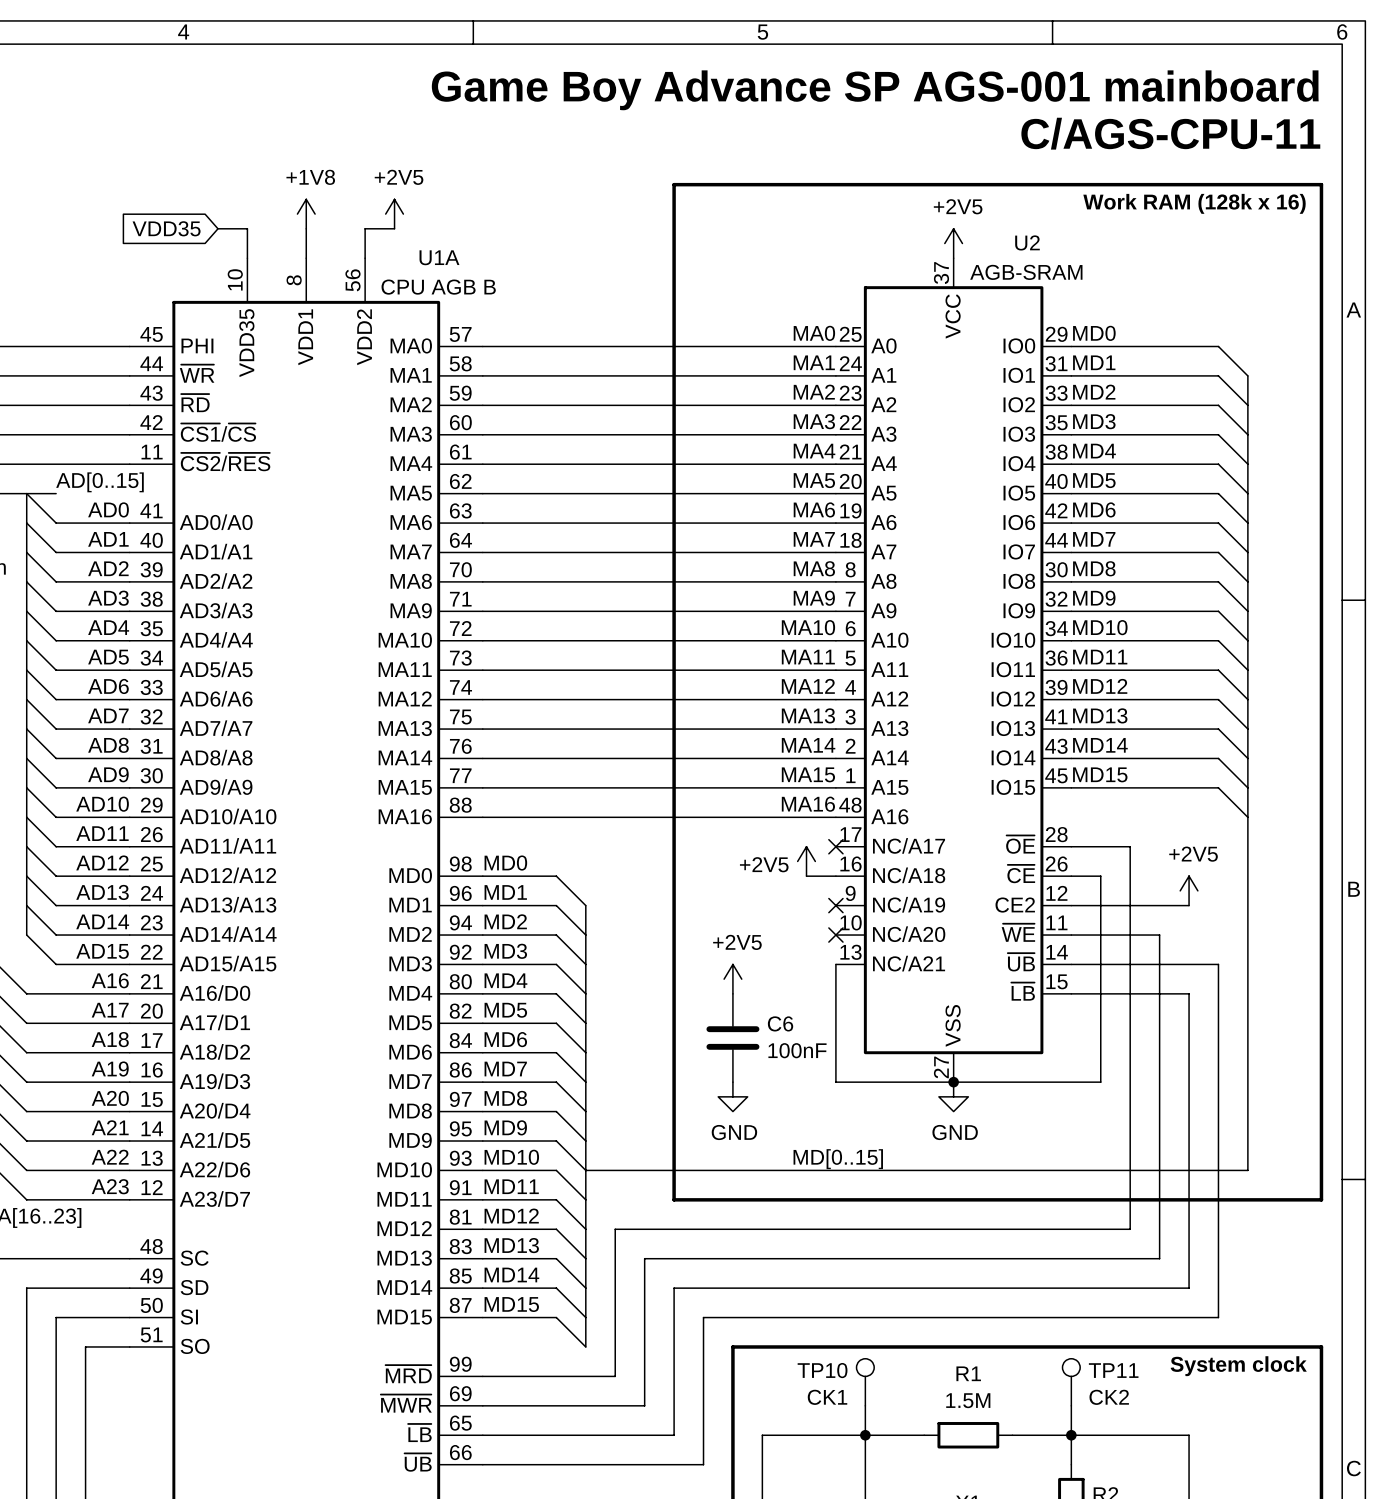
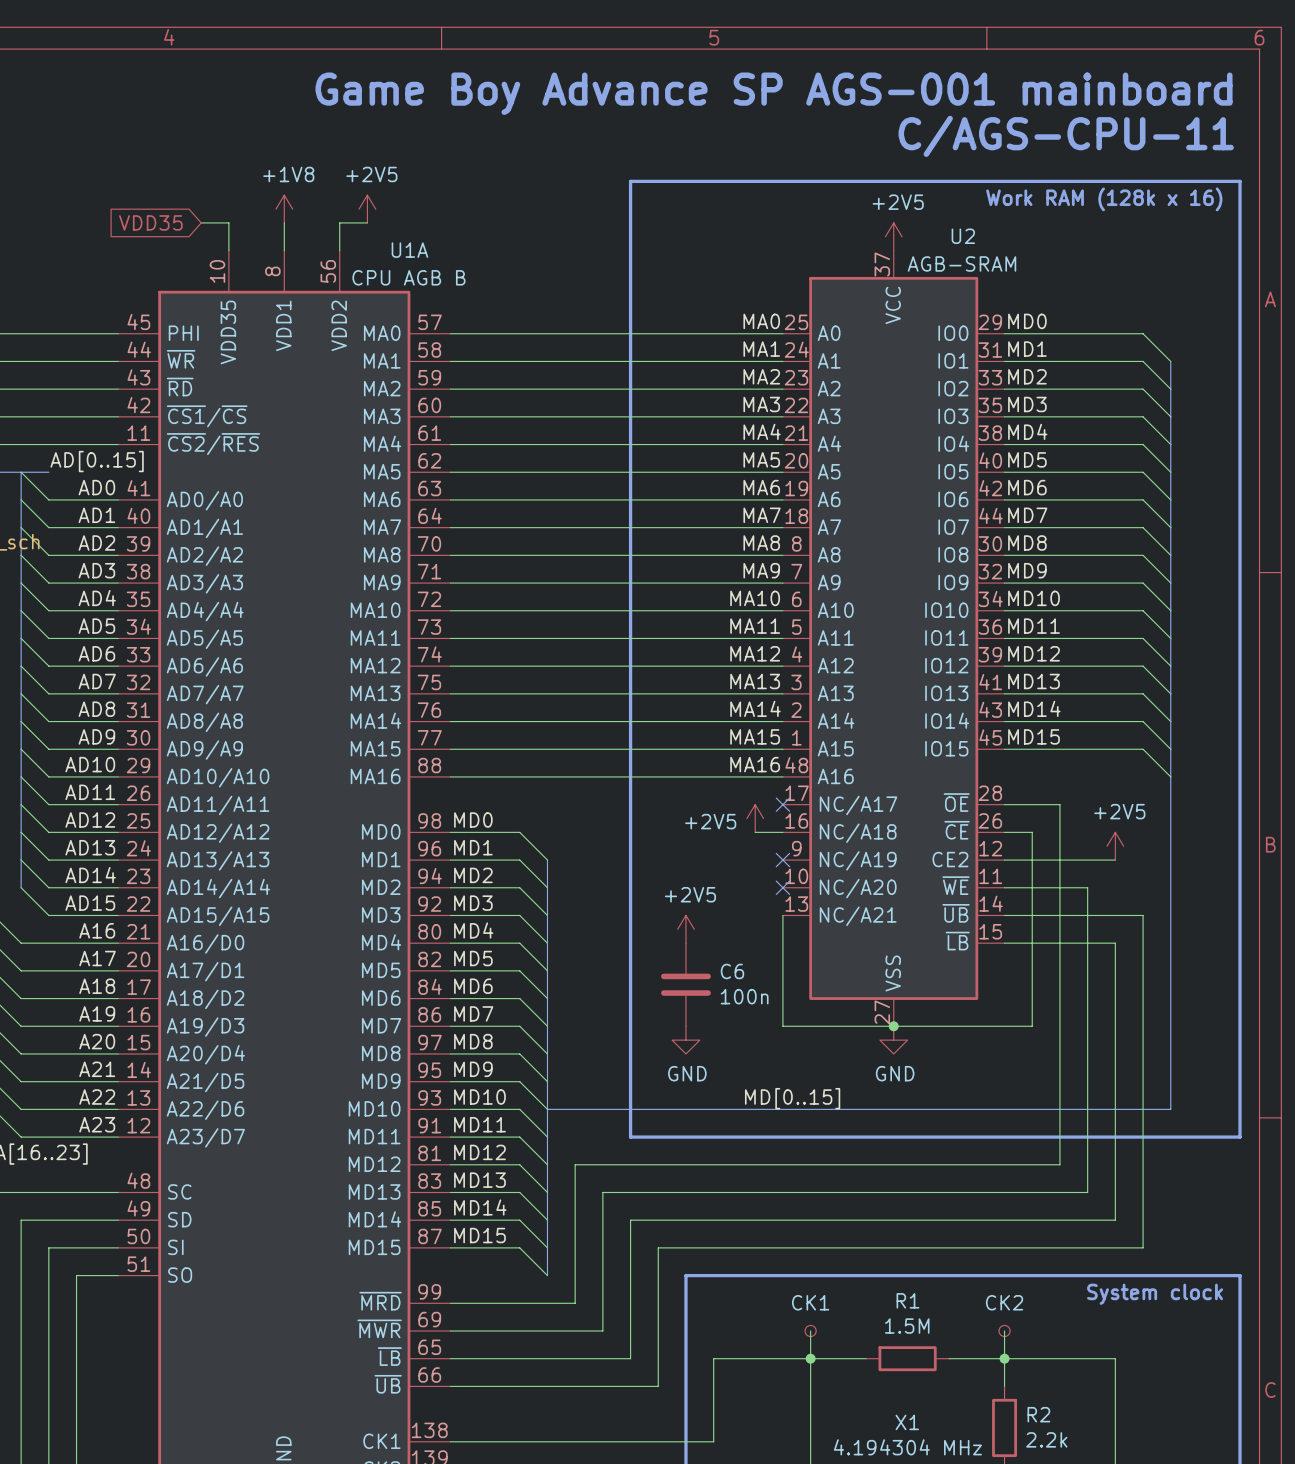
C6 value: 100nF (797, 1050) -> 100n (744, 996)
TP10: CK1 (865, 1382) -> none
TP11: CK2 (1071, 1382) -> none
part: none -> CK1 (810, 1330)
part: none -> CK2 (1004, 1330)

